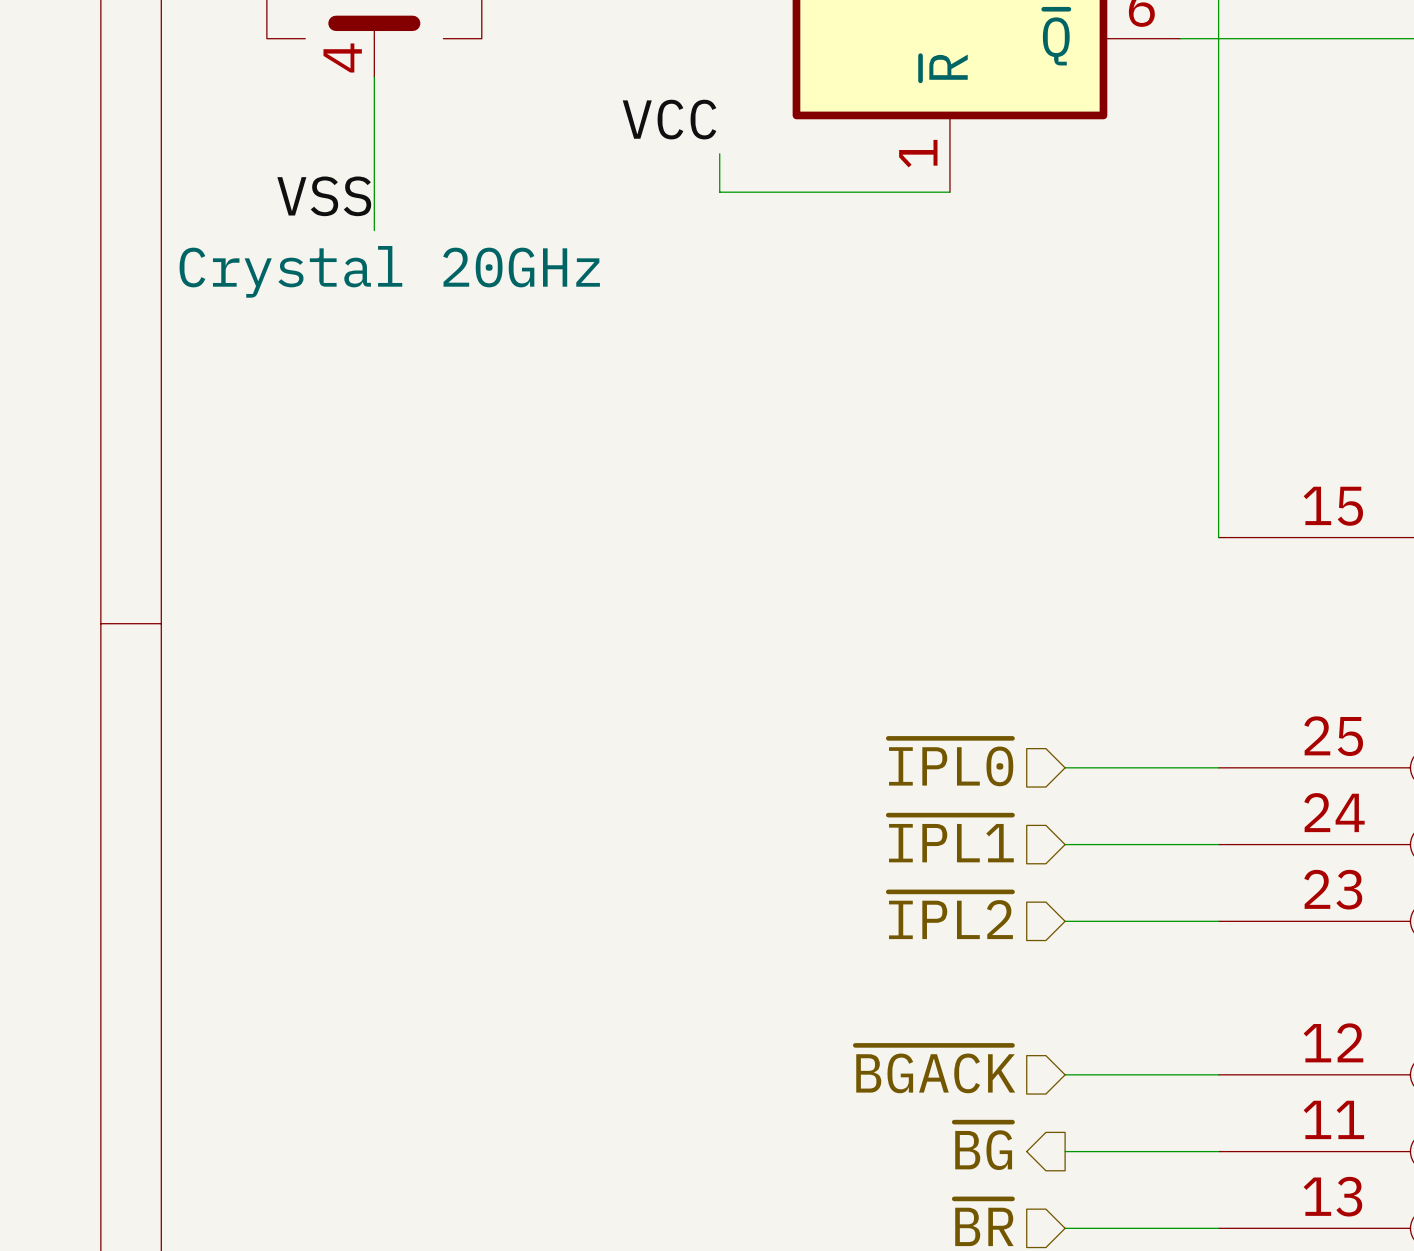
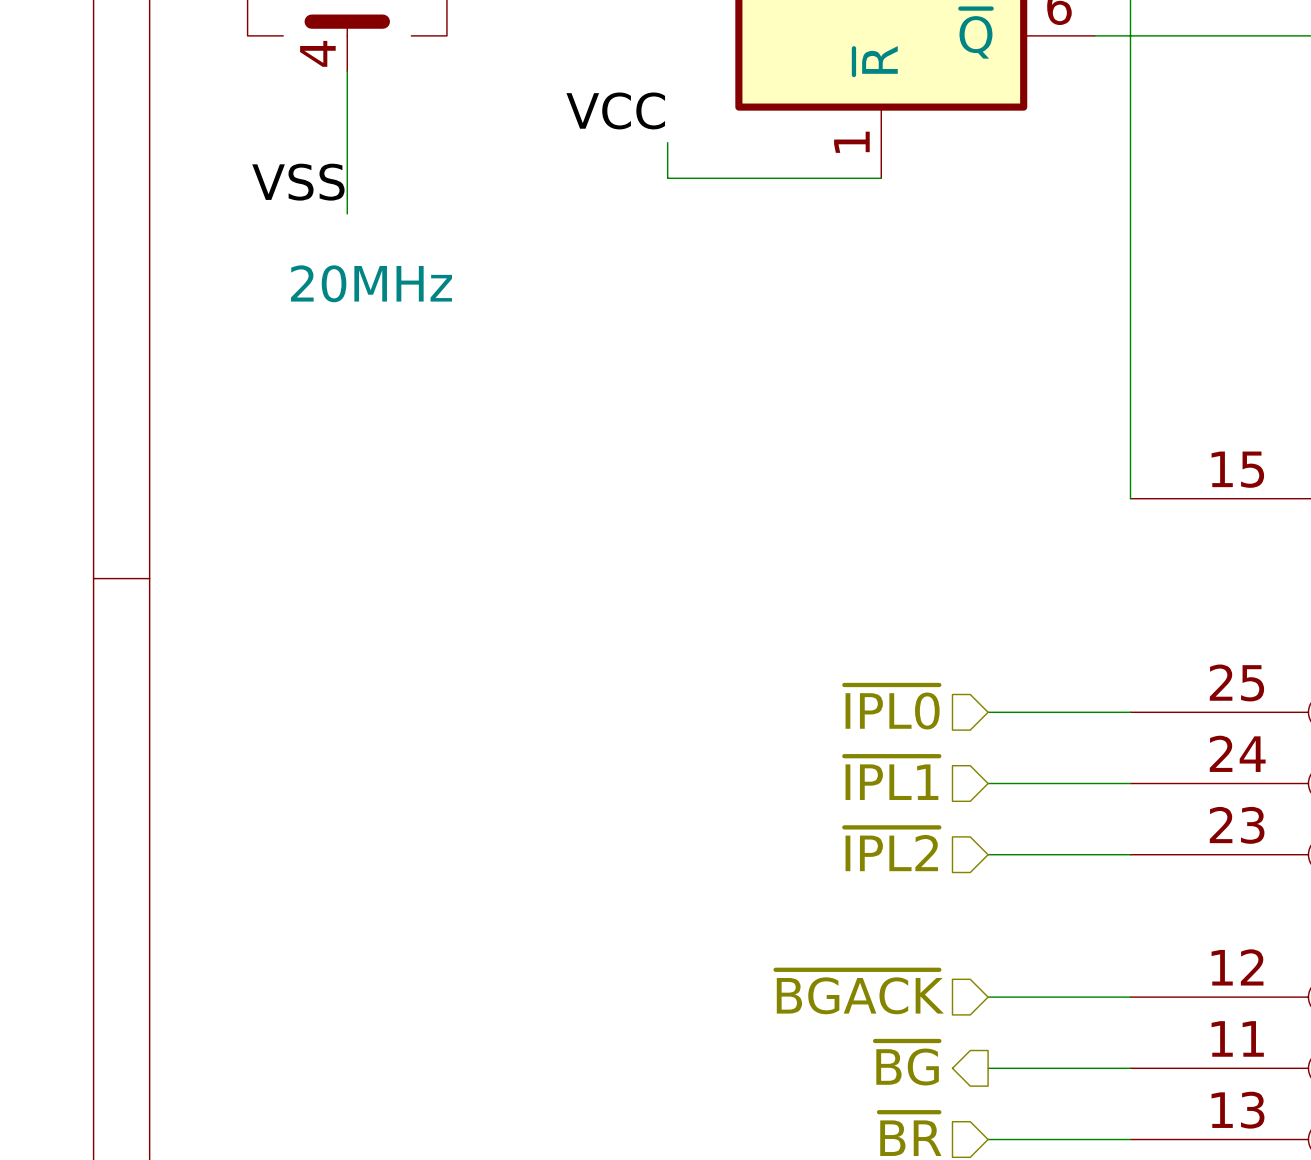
part value: Crystal 20GHz (389, 271) -> 20MHz (371, 283)

